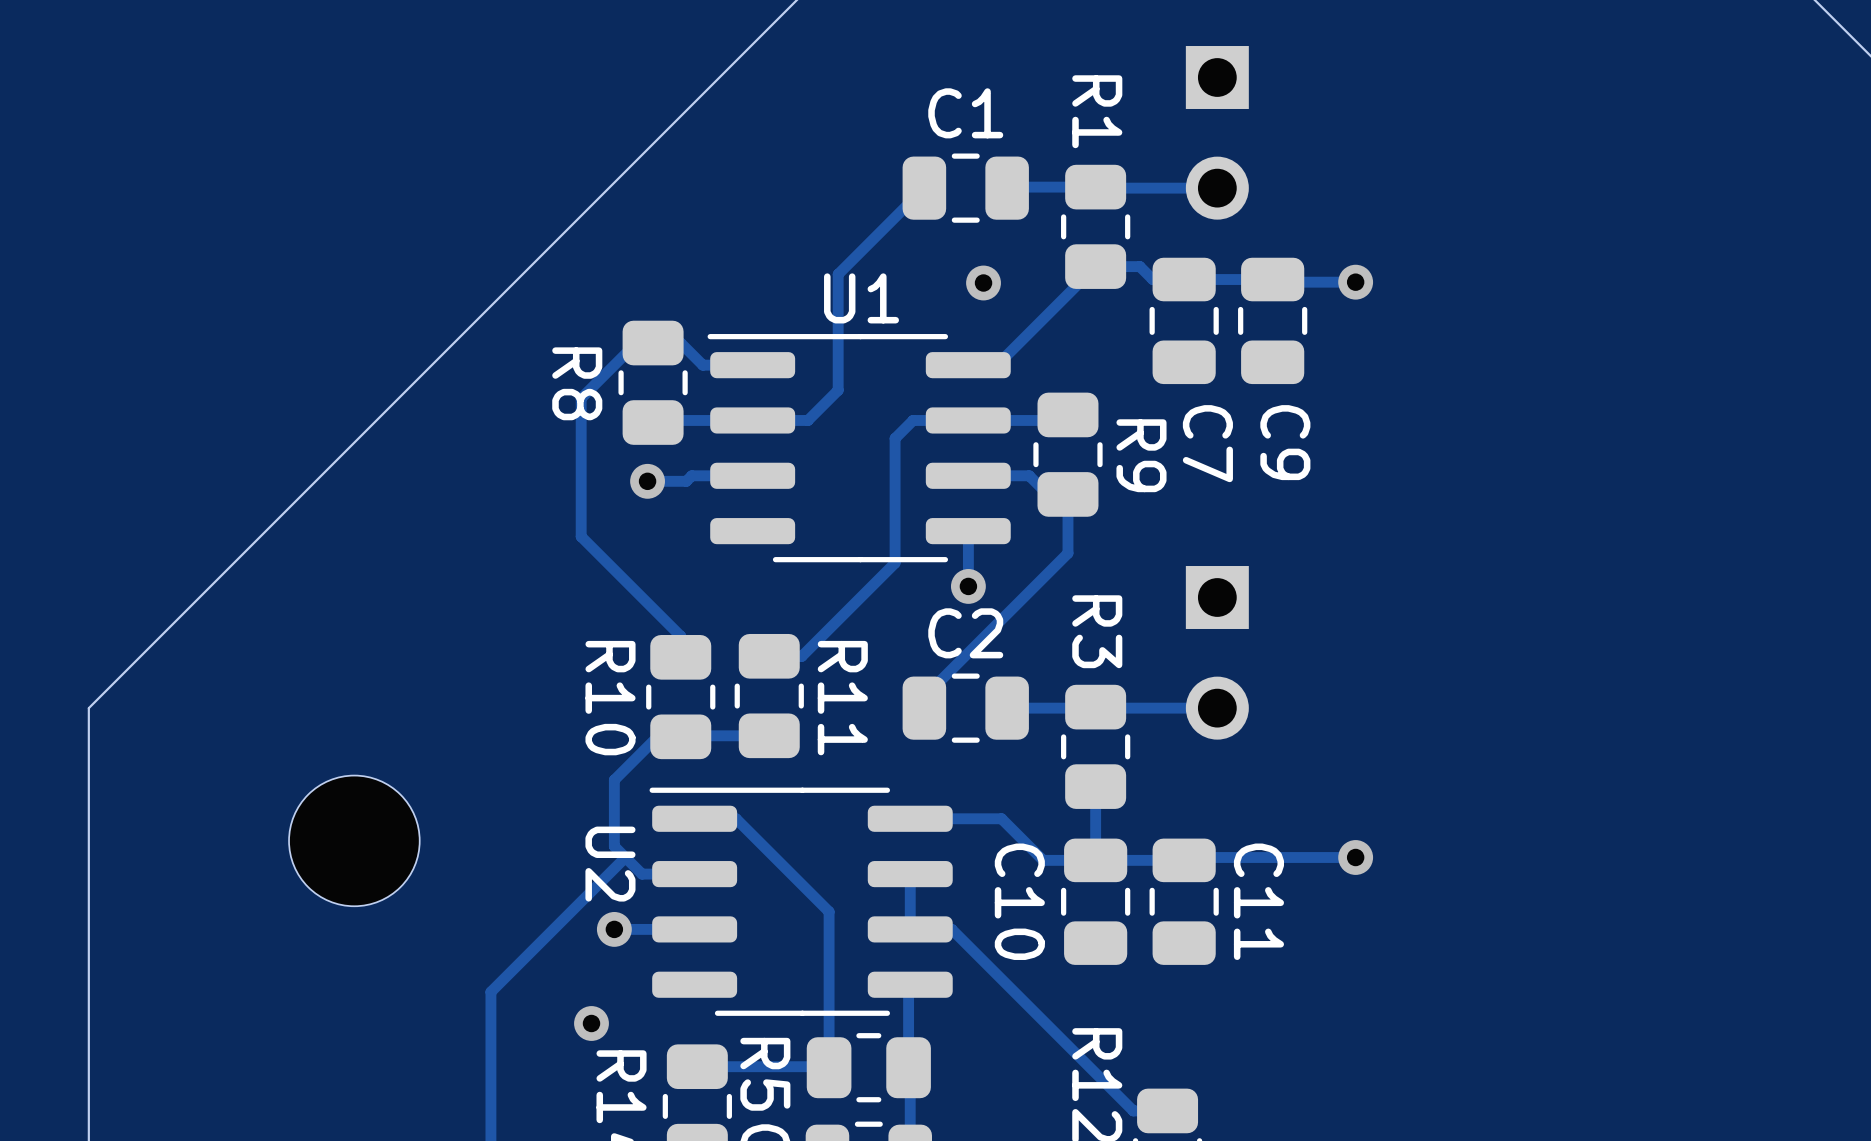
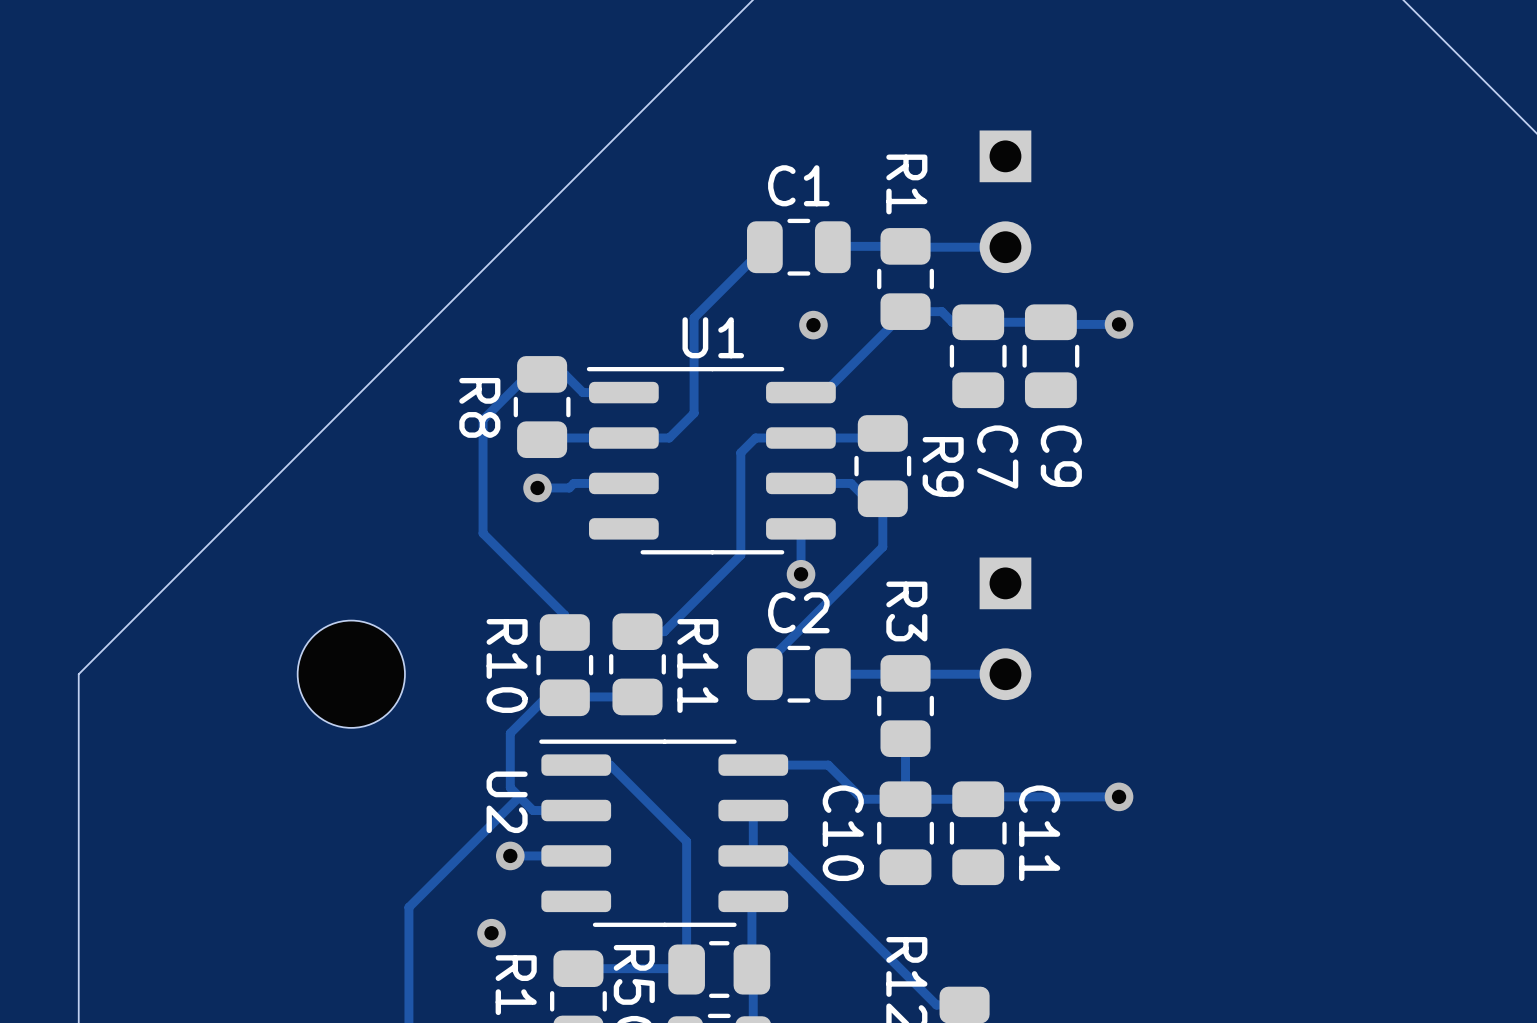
part position: (354, 840) -> (351, 674)

